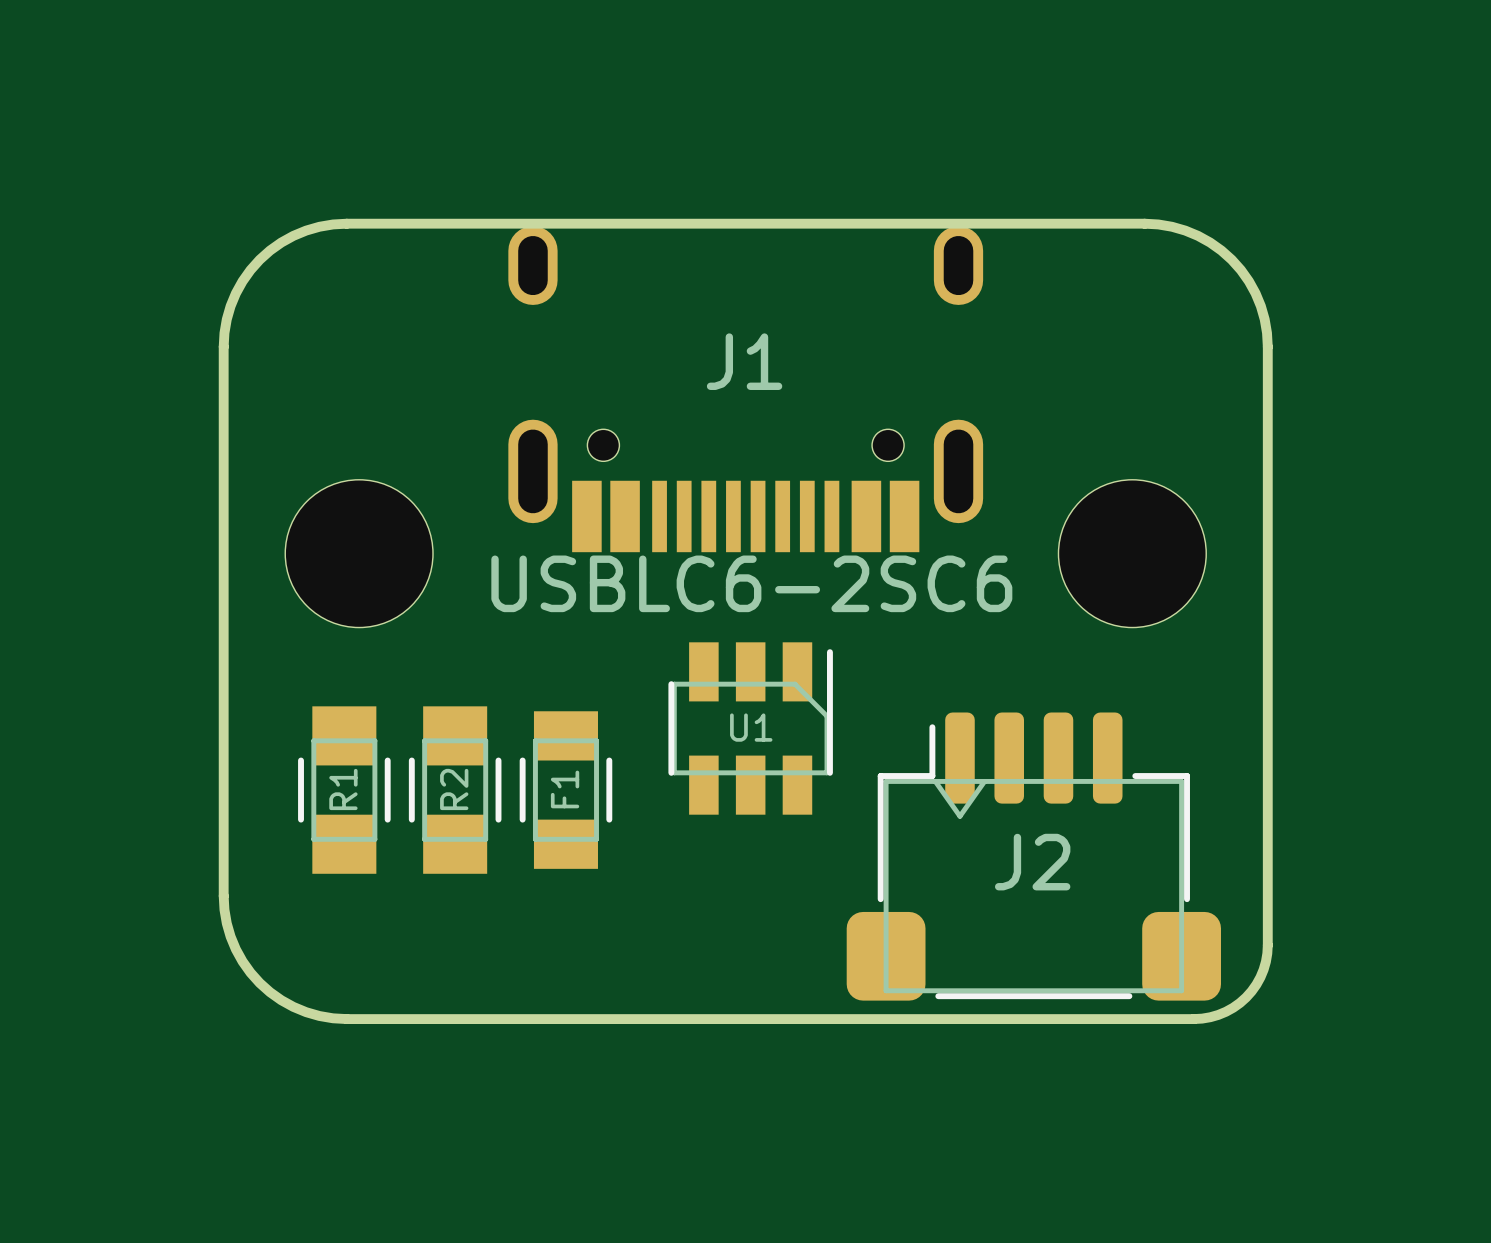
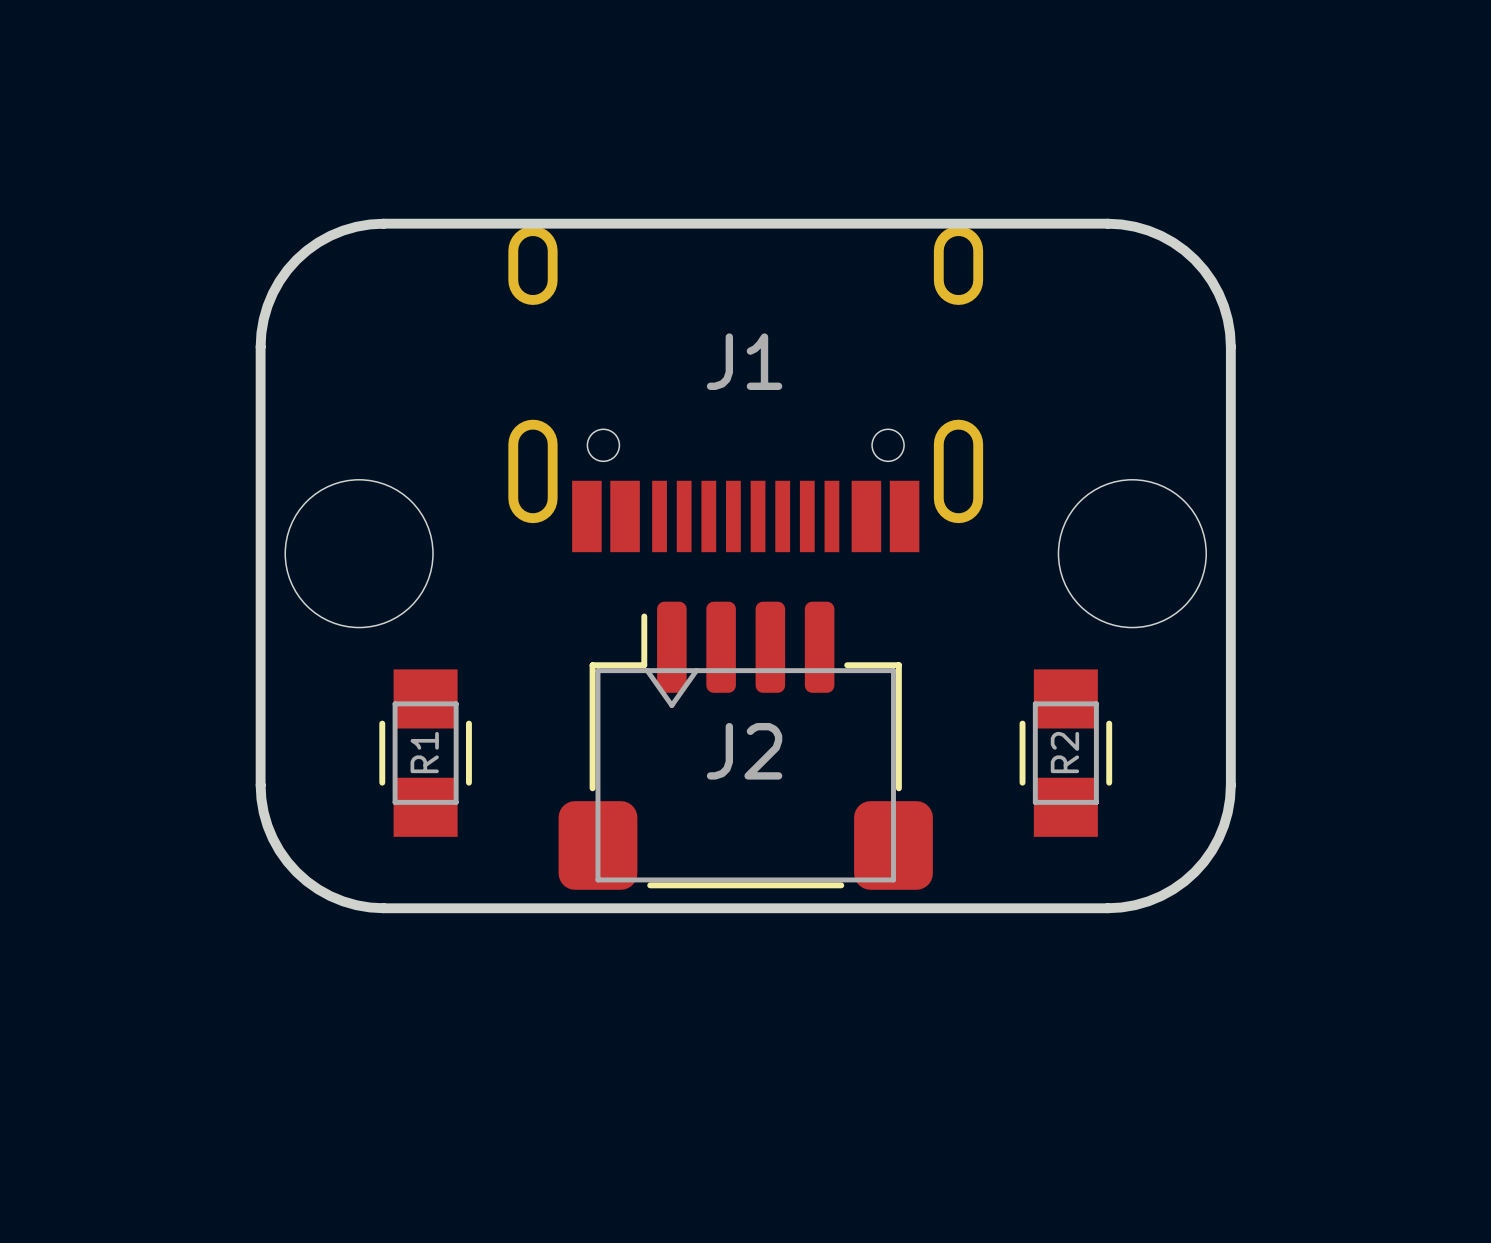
board edge: (383, 223) (346, 223) (319, 226) (306, 230) (281, 242) (259, 259) (242, 281) (230, 306) (224, 333) (223, 895) (224, 909) (230, 936) (242, 961) (259, 983) (281, 1000) (306, 1012) (319, 1015) (346, 1019) (1202, 1018) (1225, 1011) (1246, 997) (1260, 977) (1267, 953) (1267, 333) (1260, 306) (1248, 281) (1231, 259) (1210, 242) (1198, 235) (1172, 226) (1144, 223) (1107, 223) -> (383, 223) (356, 226) (330, 235) (306, 250) (296, 259) (287, 270) (272, 293) (263, 319) (260, 346) (260, 785) (263, 812) (267, 825) (279, 850) (287, 861) (306, 881) (318, 889) (343, 901) (369, 907) (383, 908) (1107, 908) (1135, 905) (1161, 896) (1184, 881) (1194, 872) (1211, 850) (1218, 838) (1227, 812) (1230, 798) (1230, 333) (1227, 319) (1218, 293) (1203, 270) (1184, 250) (1161, 235) (1148, 230) (1135, 226) (1107, 223)
U1: USBLC6-2SC6 (750, 728) -> none
R1 position: (344, 790) -> (425, 753)
R2 position: (455, 790) -> (1065, 753)
F1: (565, 790) -> none
J2 position: (1033, 856) -> (745, 745)

